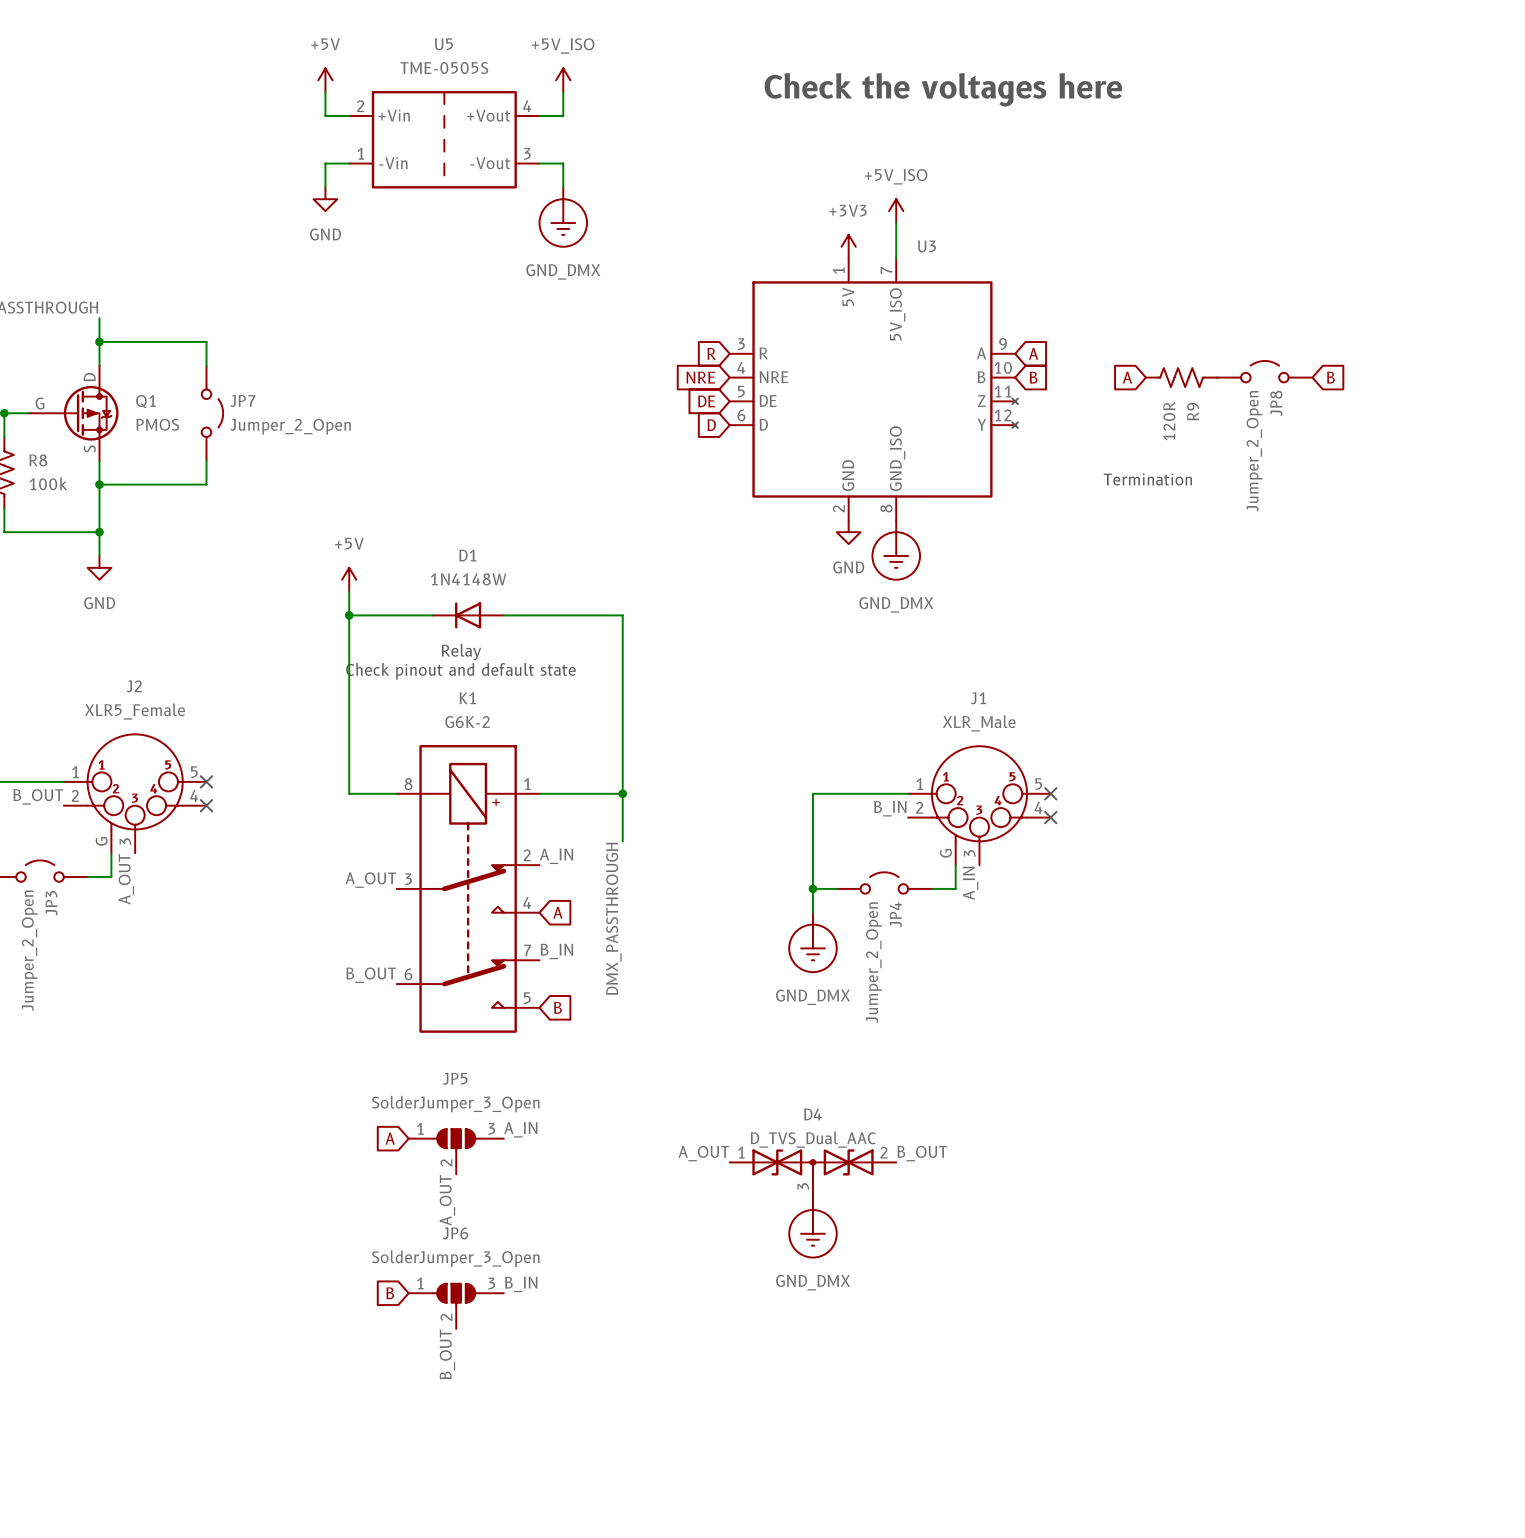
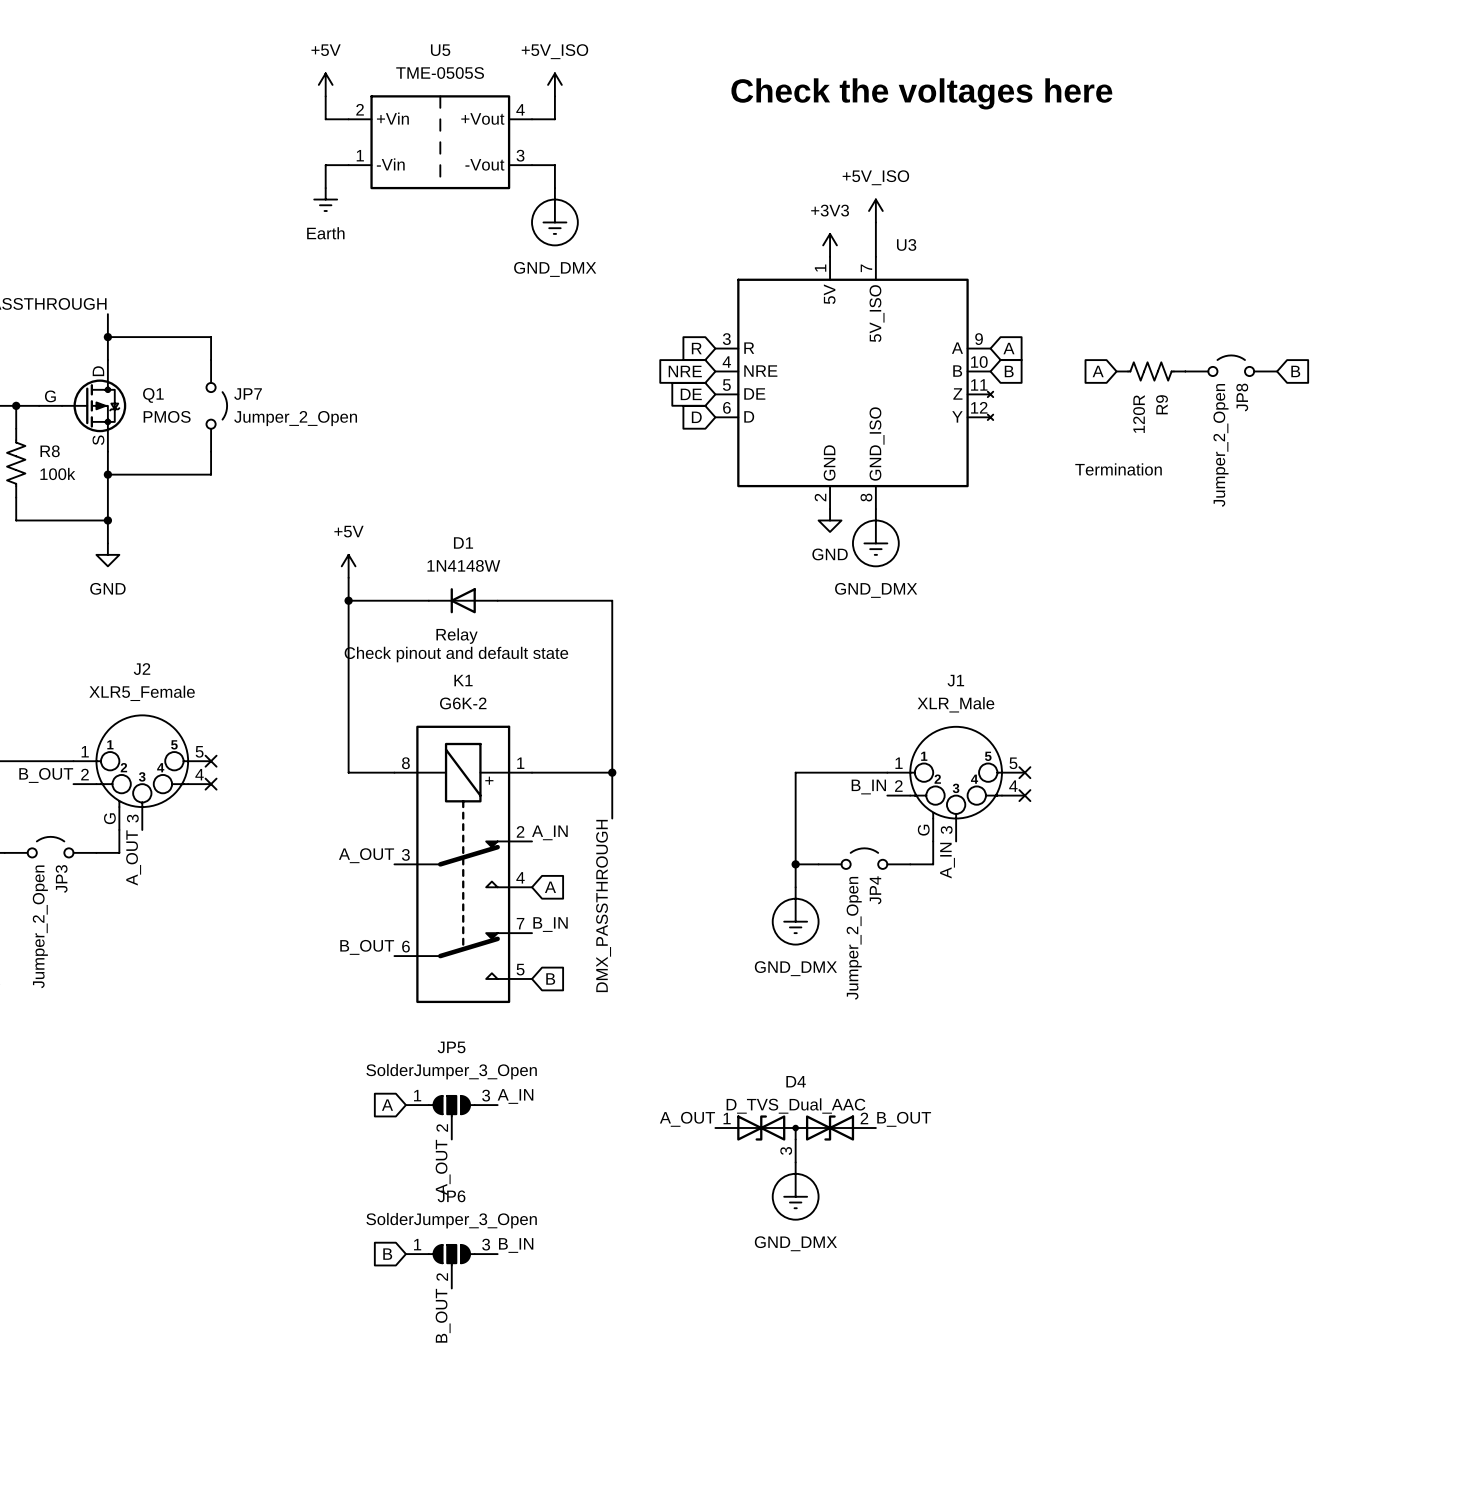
power symbol: GND (325, 199) -> Earth (325, 199)

